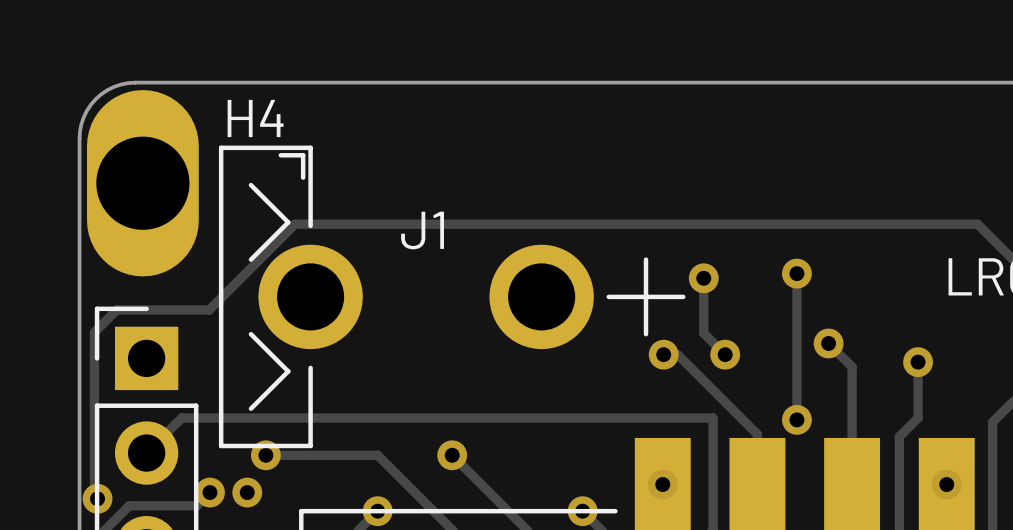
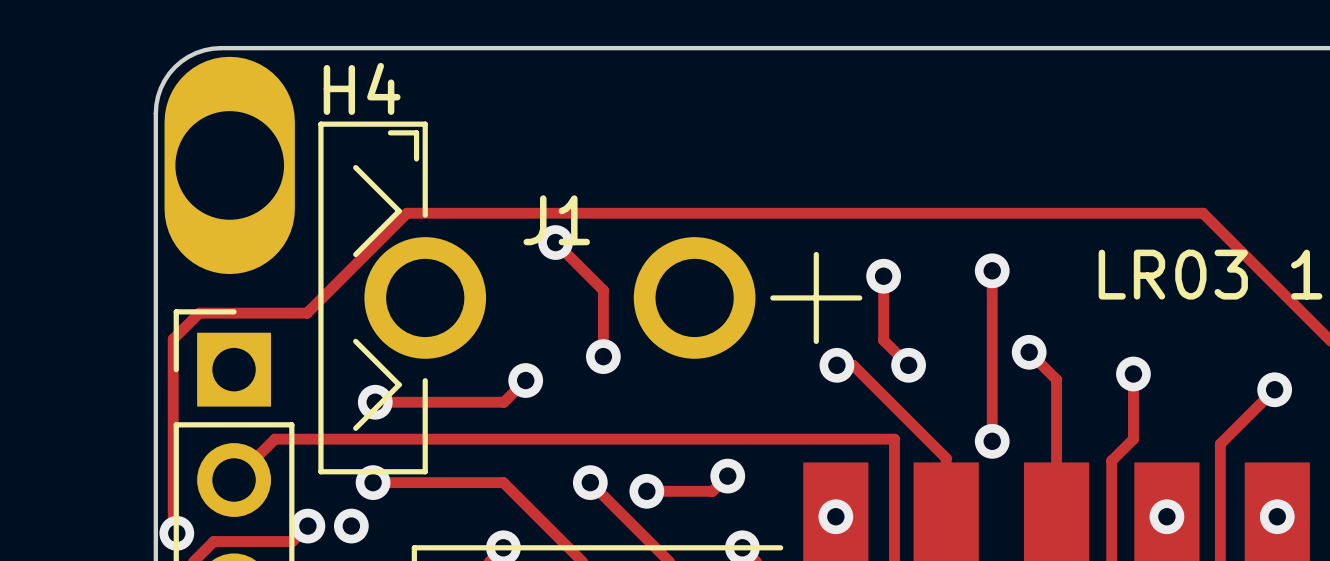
track: none -> (555, 242) (603, 290) (603, 356)
via: none -> (555, 242)
via: none -> (603, 356)
track: none -> (525, 380) (503, 402) (375, 402)
via: none -> (525, 380)
via: none -> (375, 402)
track: none -> (727, 476) (712, 491) (646, 491)
via: none -> (727, 476)
via: none -> (646, 491)

